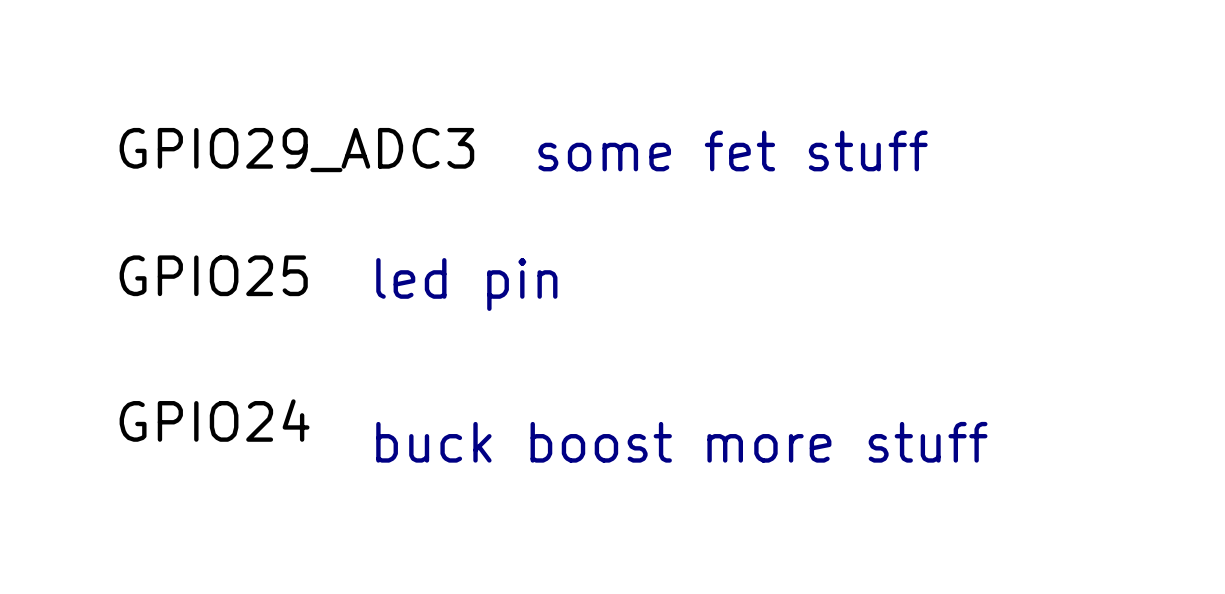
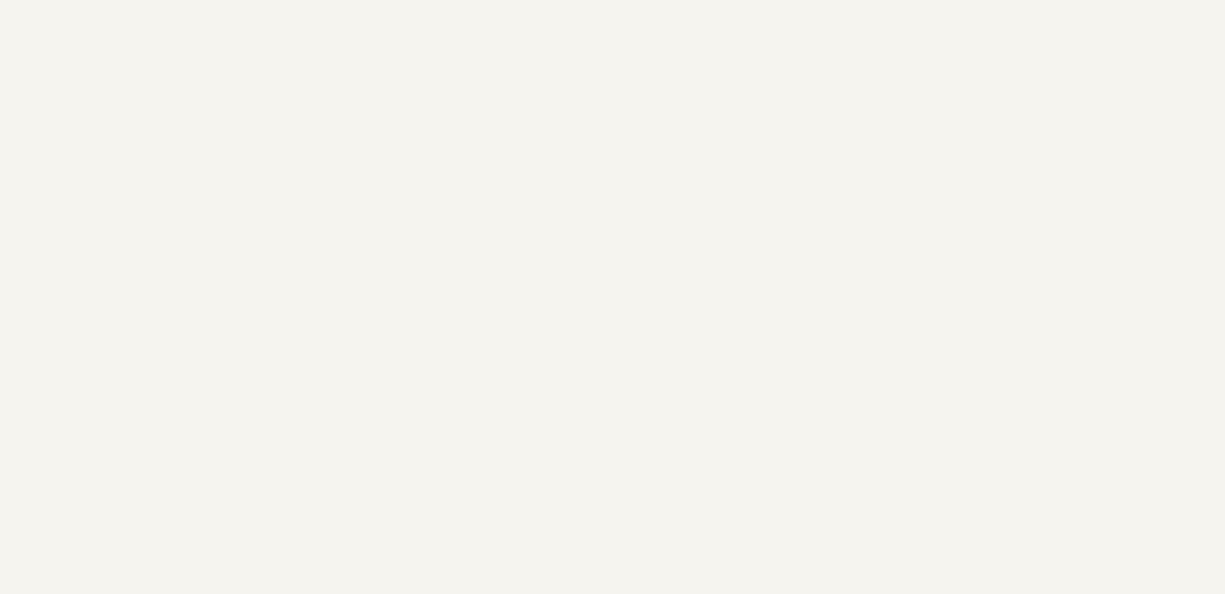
label: GPIO29_ADC3 (296, 150) -> none
text: some fet stuff (733, 150) -> none
label: GPIO25 (213, 275) -> none
text: led pin (466, 284) -> none
label: GPIO24 (214, 420) -> none
text: buck boost more stuff (681, 442) -> none

